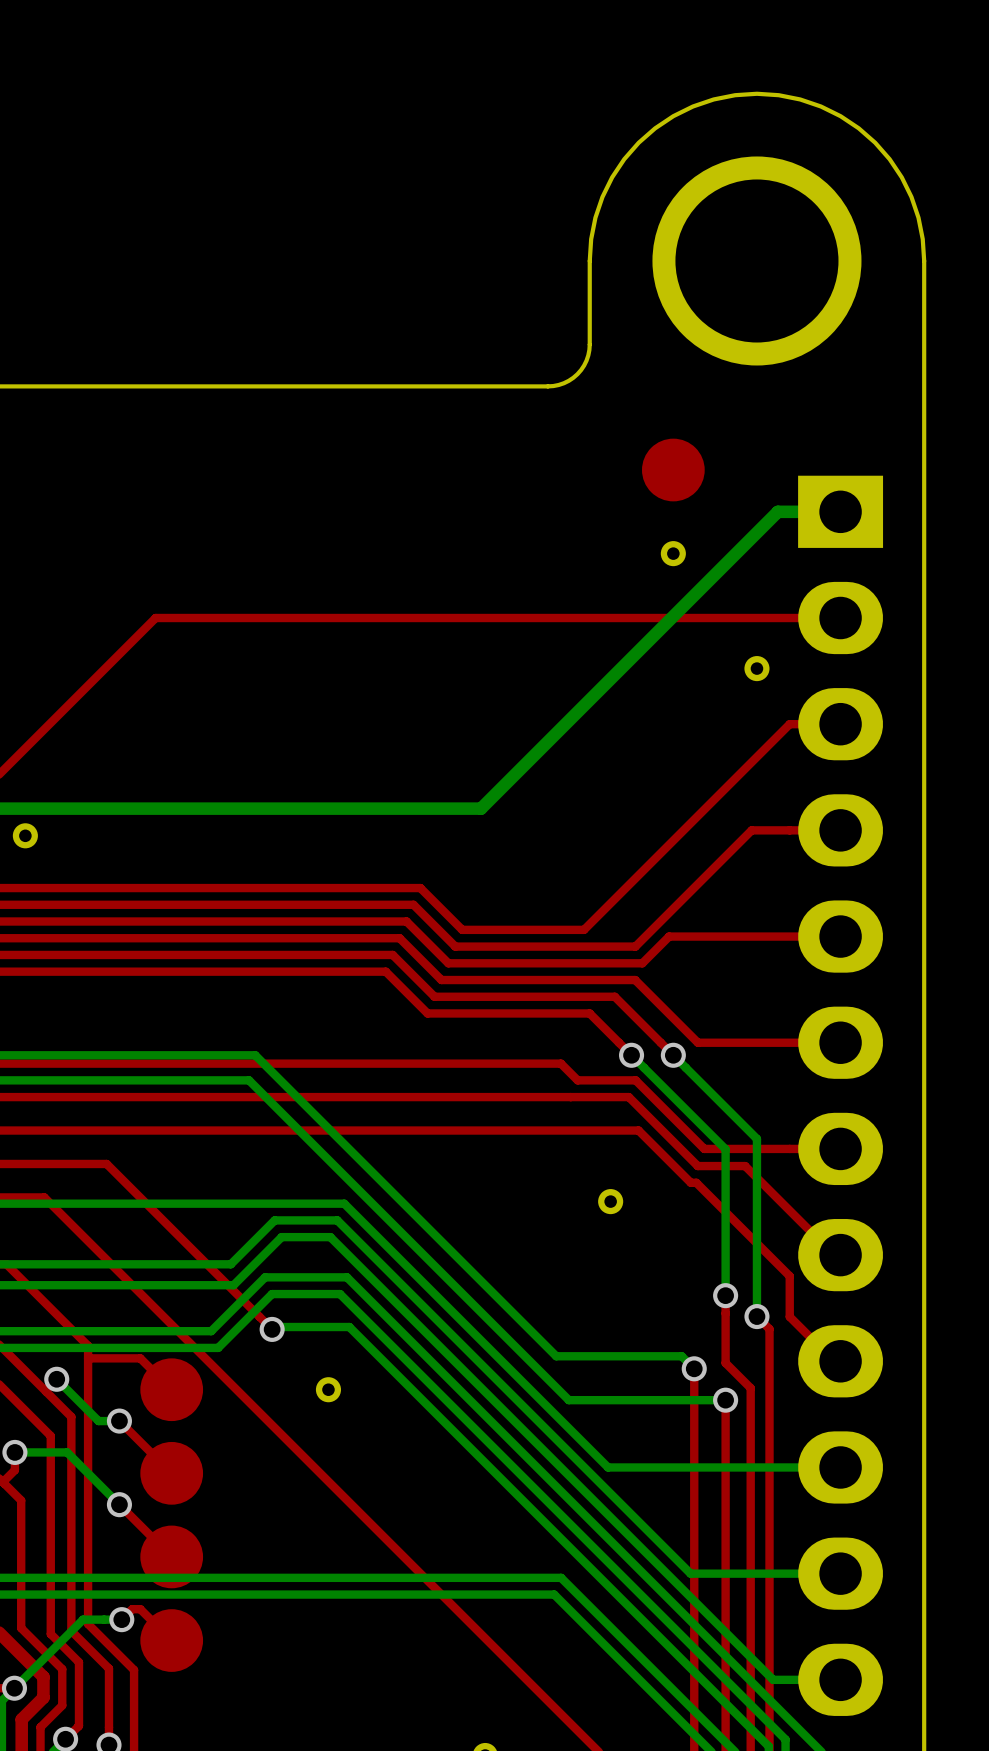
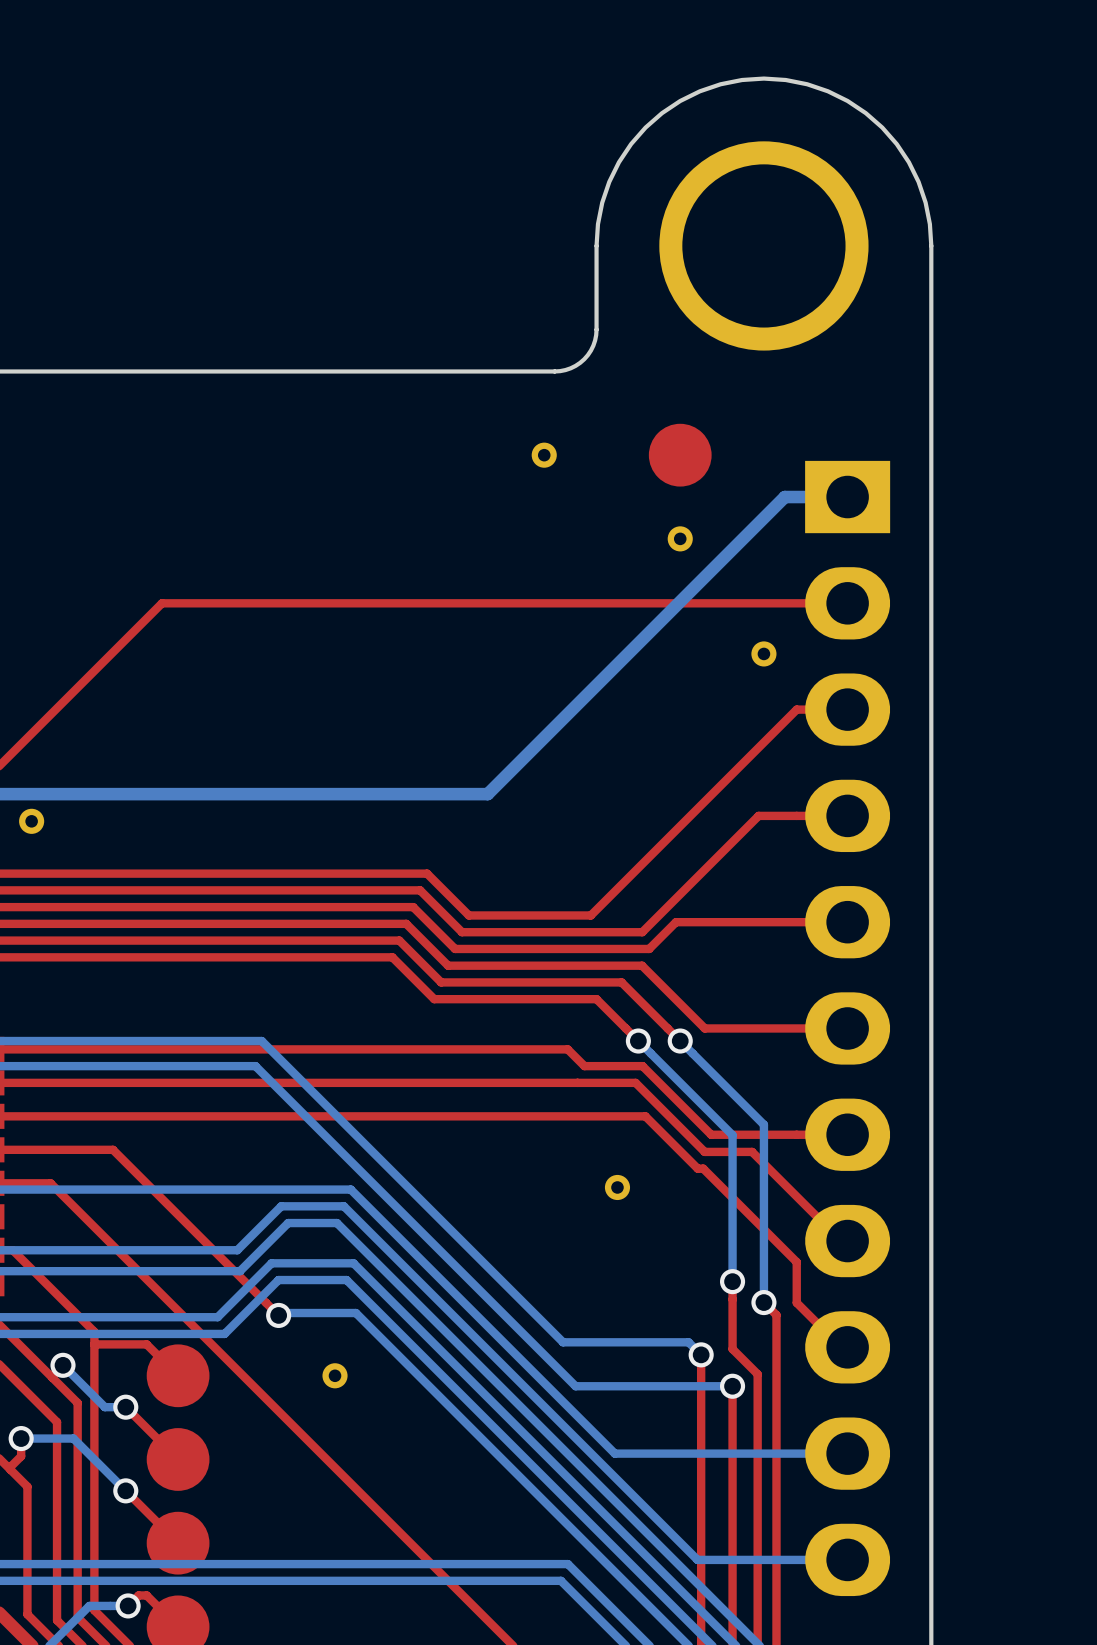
part: none -> (544, 455)

